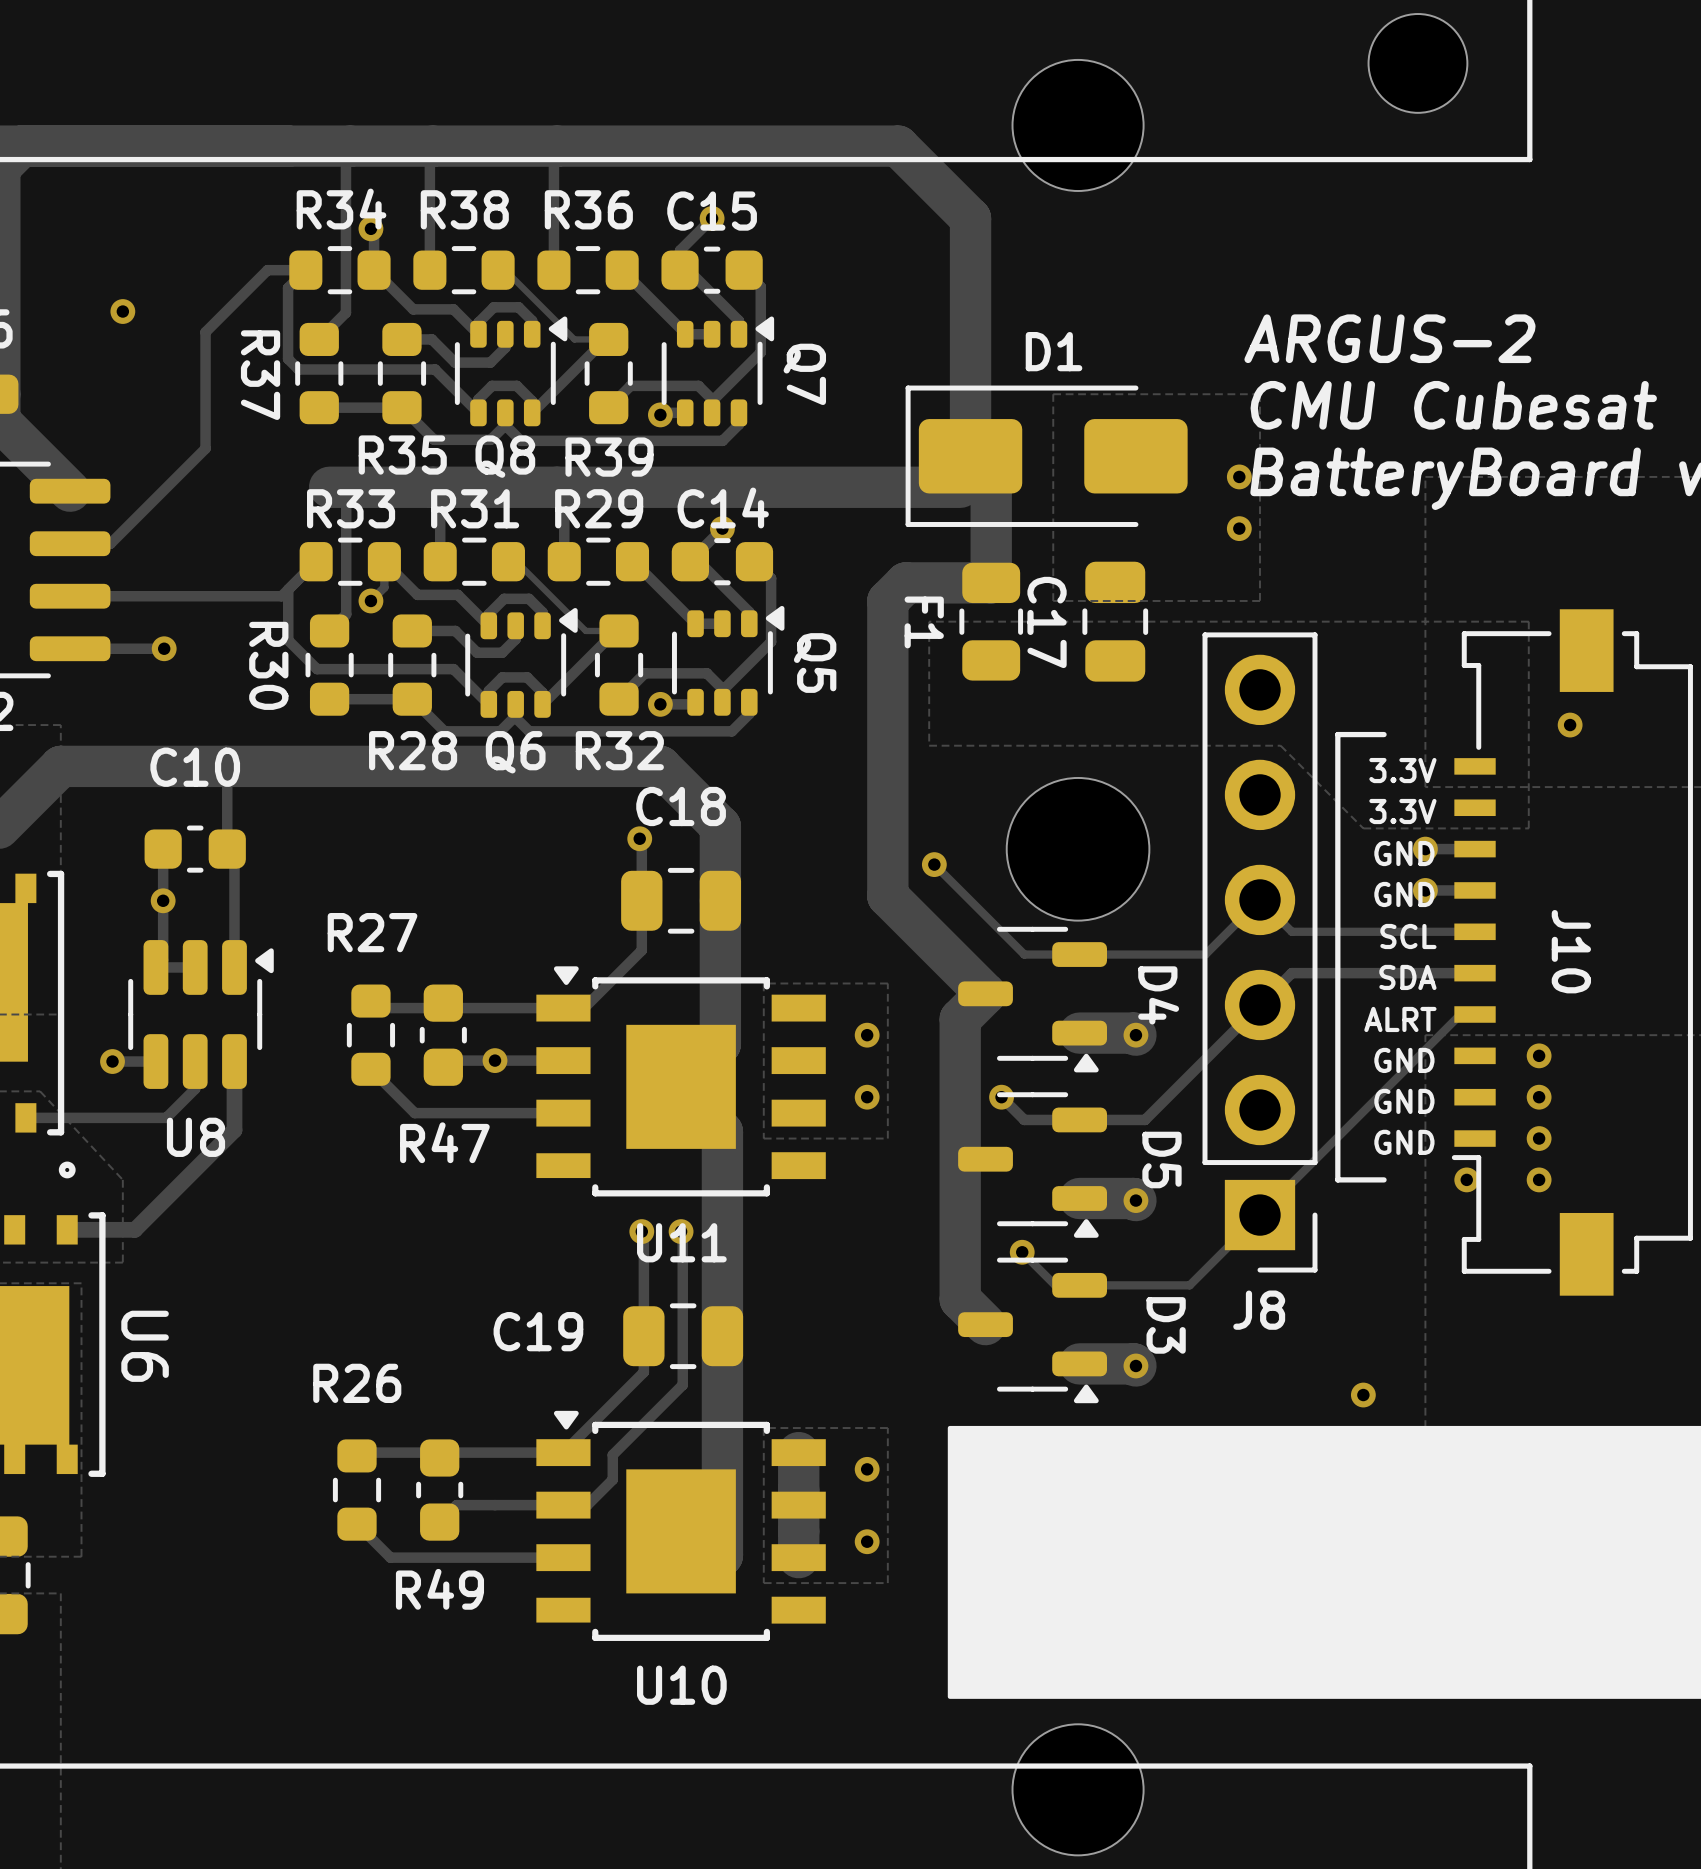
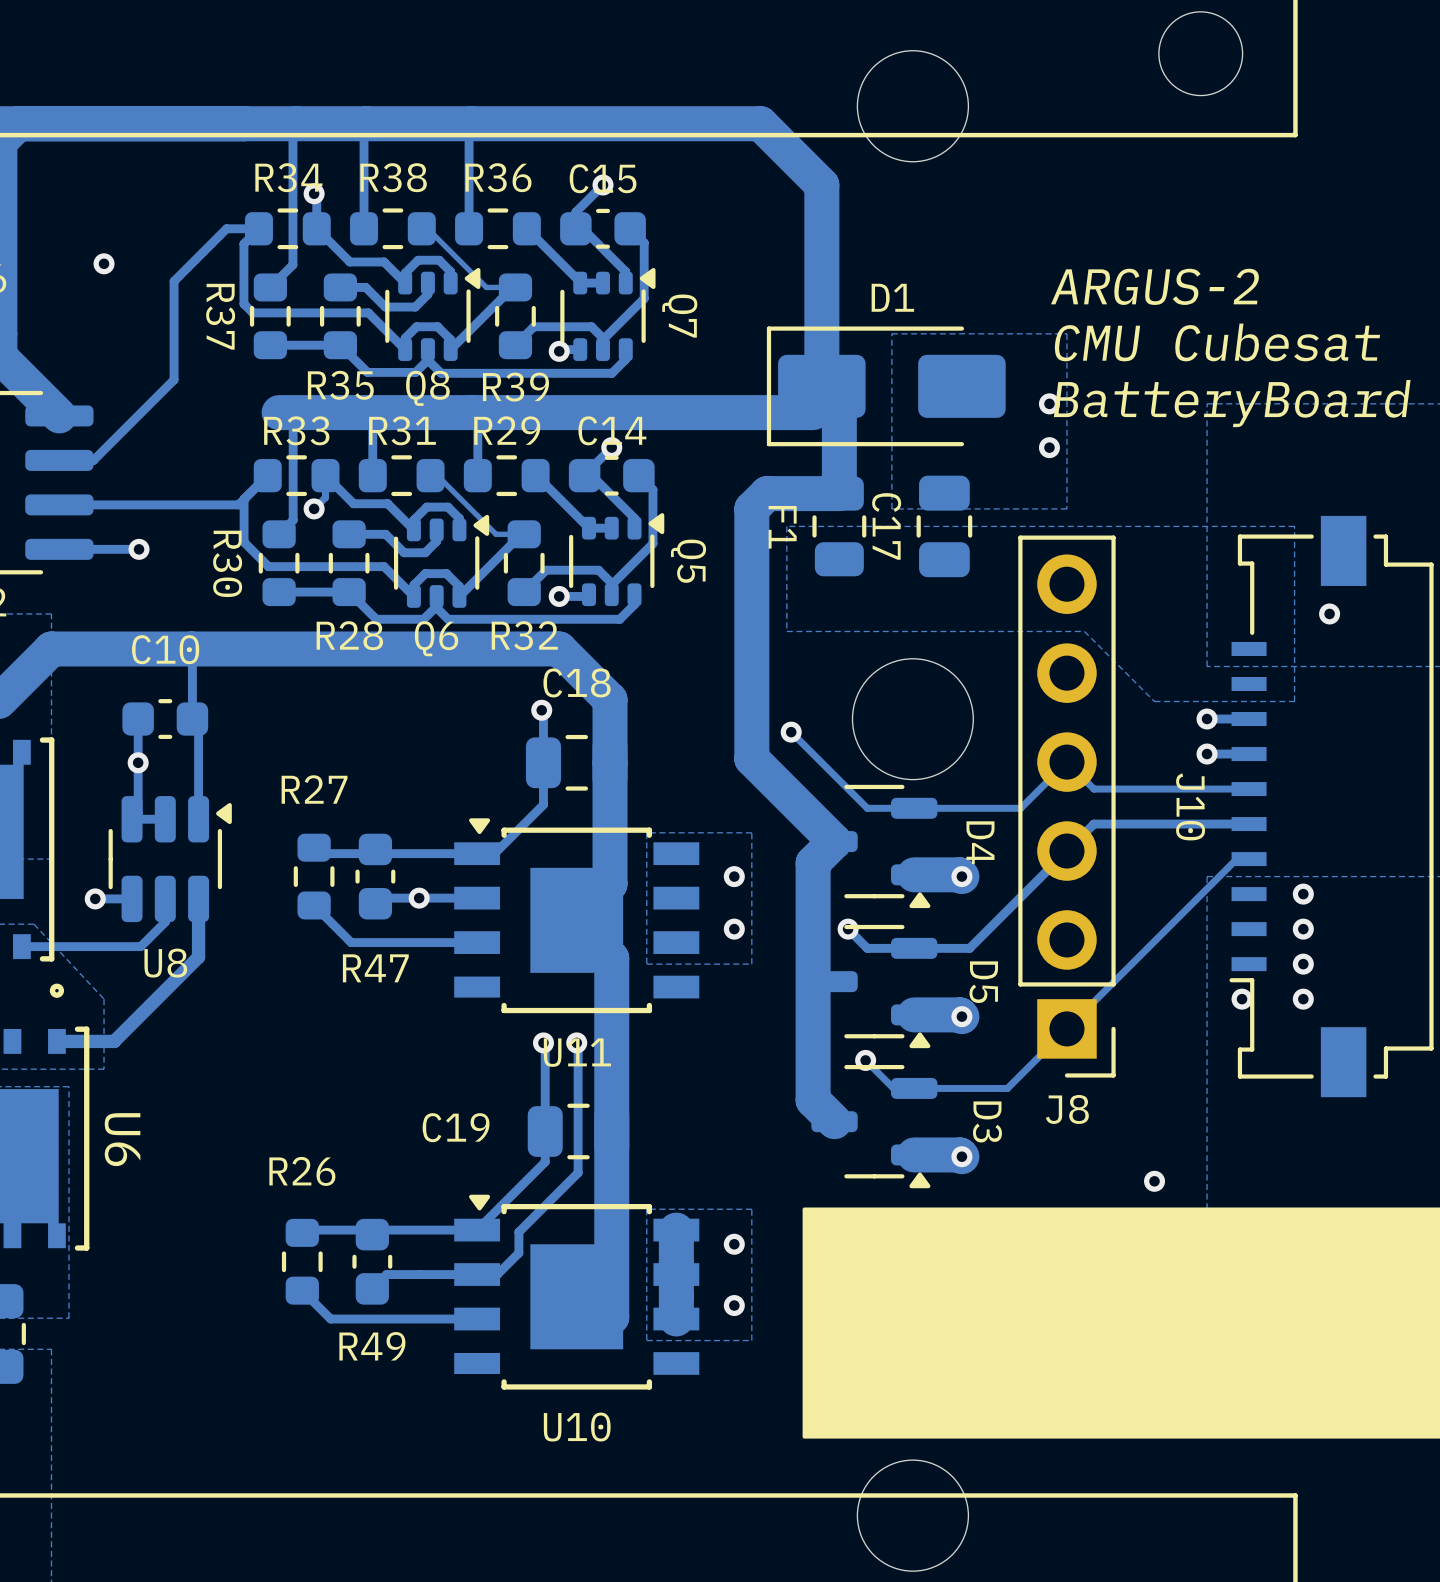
line: (1384, 734) (1337, 734) (1337, 1179) (1384, 1179) -> none
text: 3.3V (1402, 770) -> none
text: 3.3V (1402, 811) -> none
text: GND (1404, 853) -> none
text: GND (1404, 894) -> none
text: SCL (1408, 936) -> none
J10 name position: J10 (1571, 951) -> J10 (1190, 806)
text: SDA (1407, 977) -> none
text: ALRT (1400, 1019) -> none
text: GND (1404, 1060) -> none
text: GND (1404, 1101) -> none
text: GND (1404, 1142) -> none

